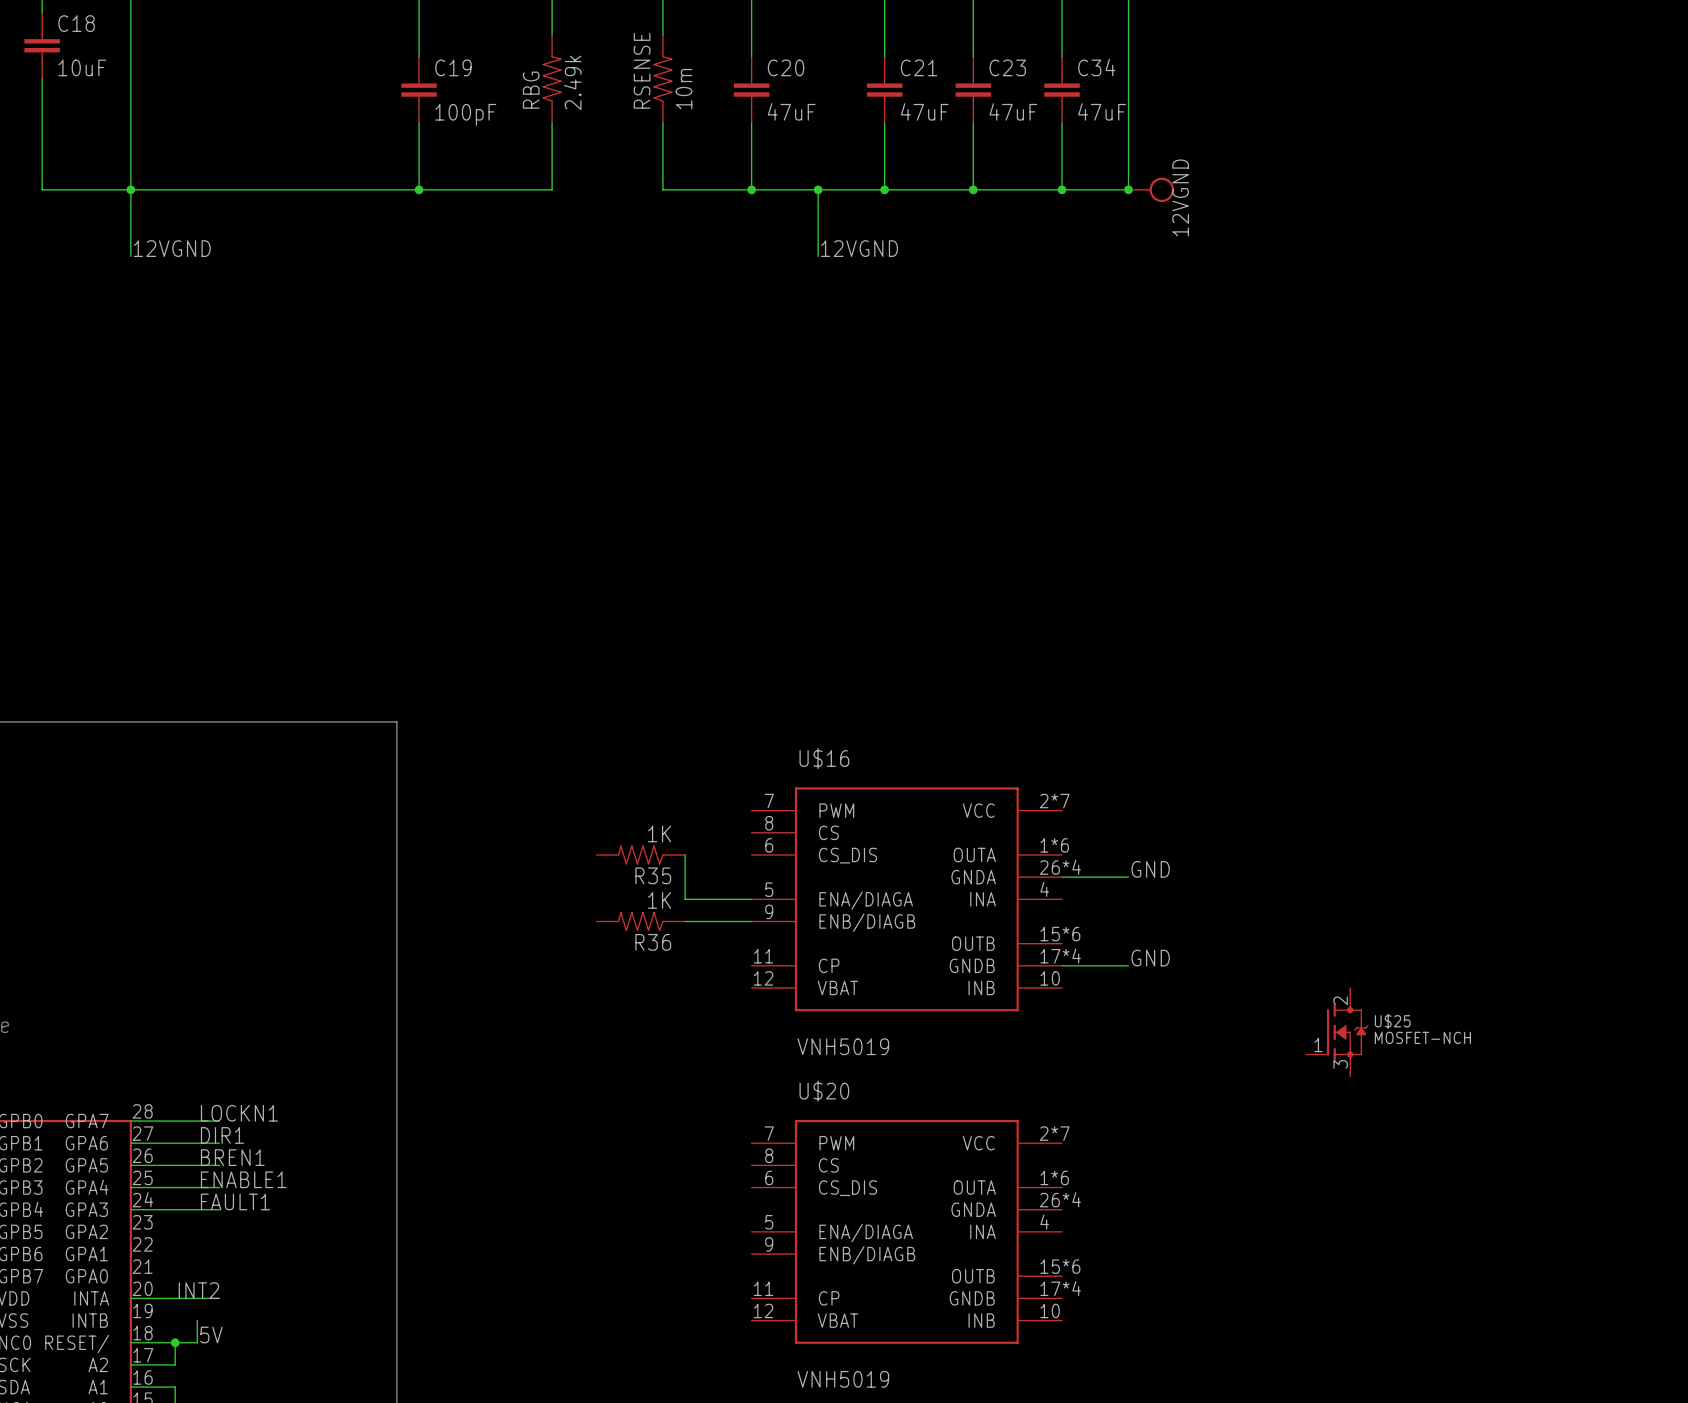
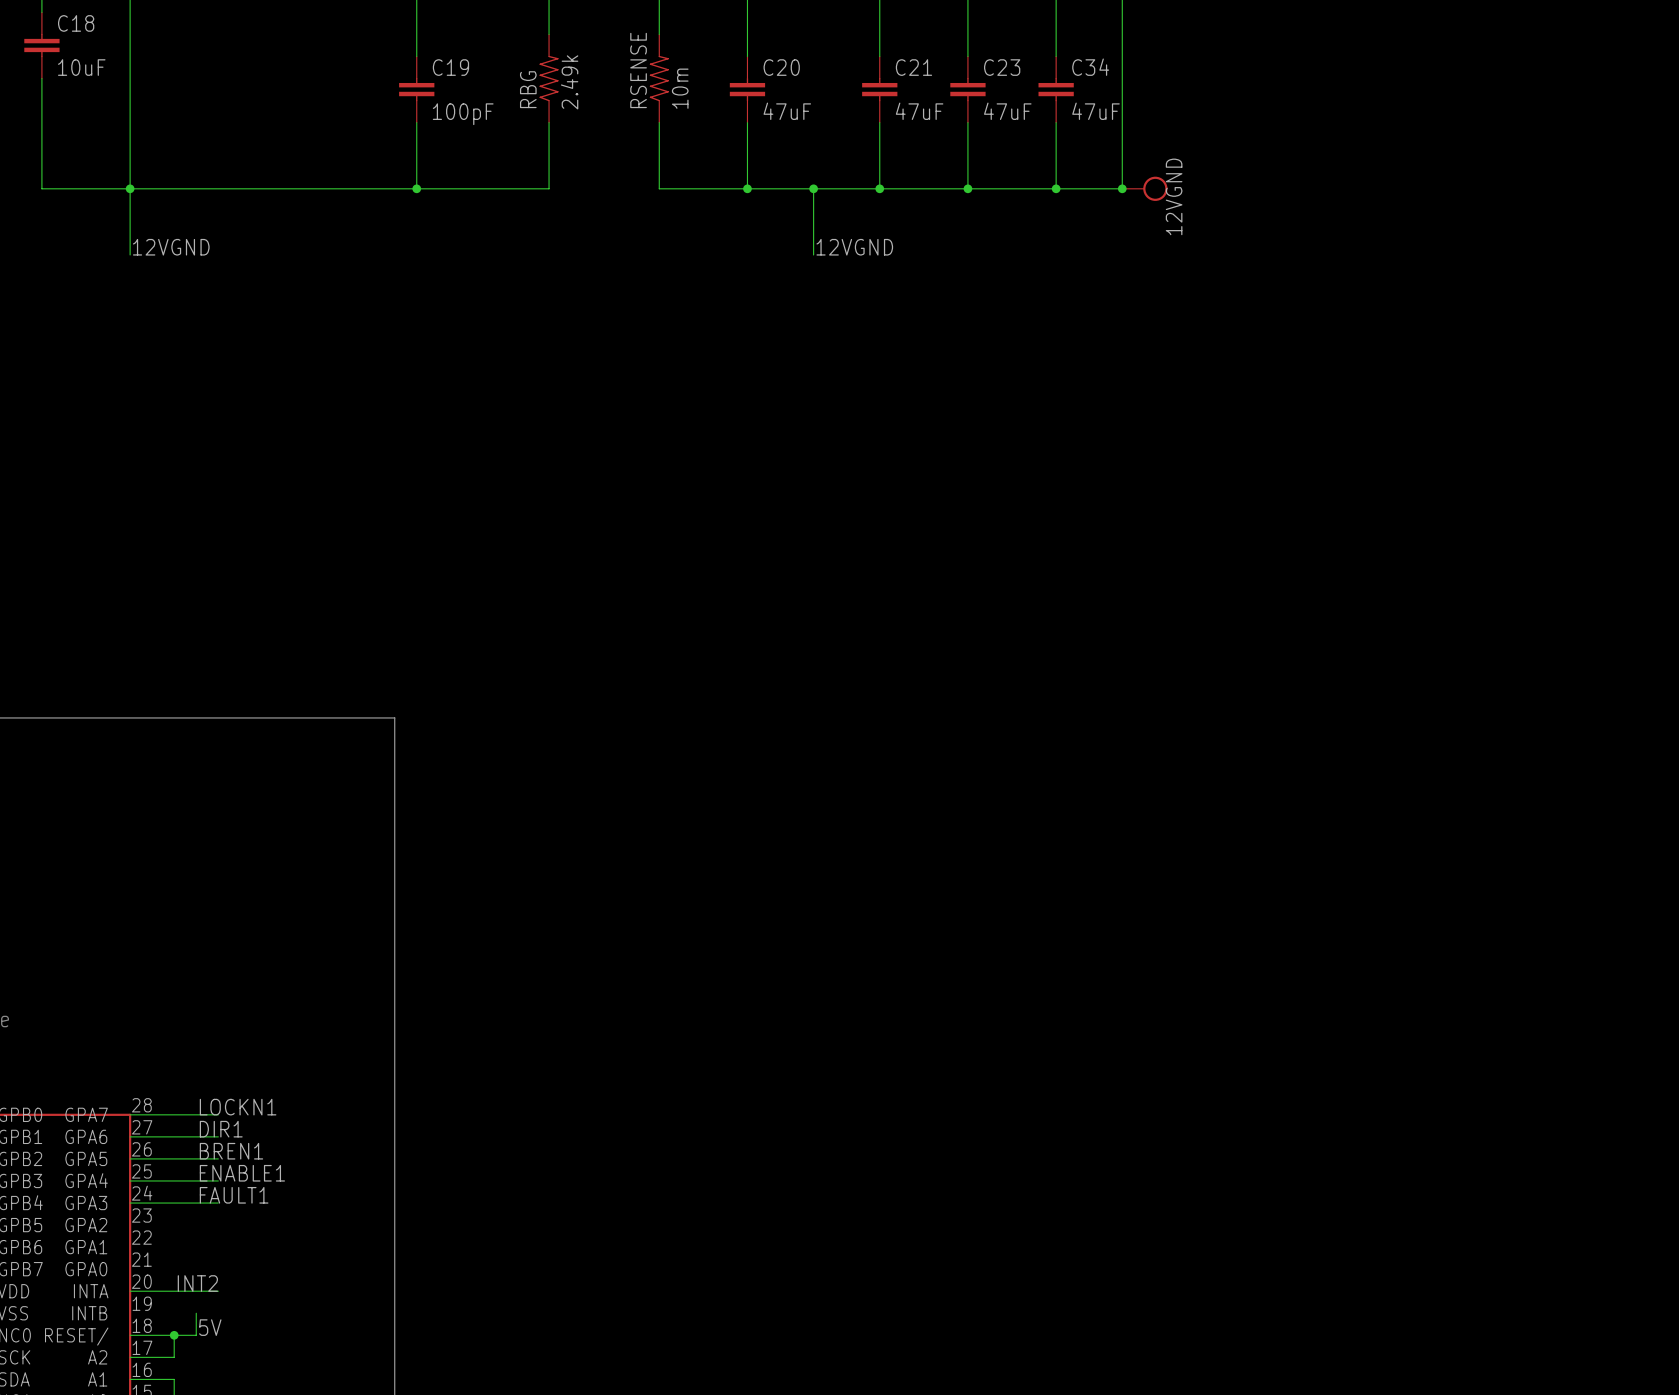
R35: 1K (640, 854) -> none
wire: (685, 854) (685, 899) (751, 899) -> none
label: GND (1150, 869) -> none
wire: (1062, 877) (1128, 877) -> none
U$16: VNH5019 (906, 899) -> none
R36: 1K (640, 921) -> none
wire: (685, 921) (751, 921) -> none
label: GND (1150, 958) -> none
wire: (1062, 965) (1128, 965) -> none
U$25: MOSFET-NCH (1337, 1032) -> none
U$20: VNH5019 (906, 1231) -> none

